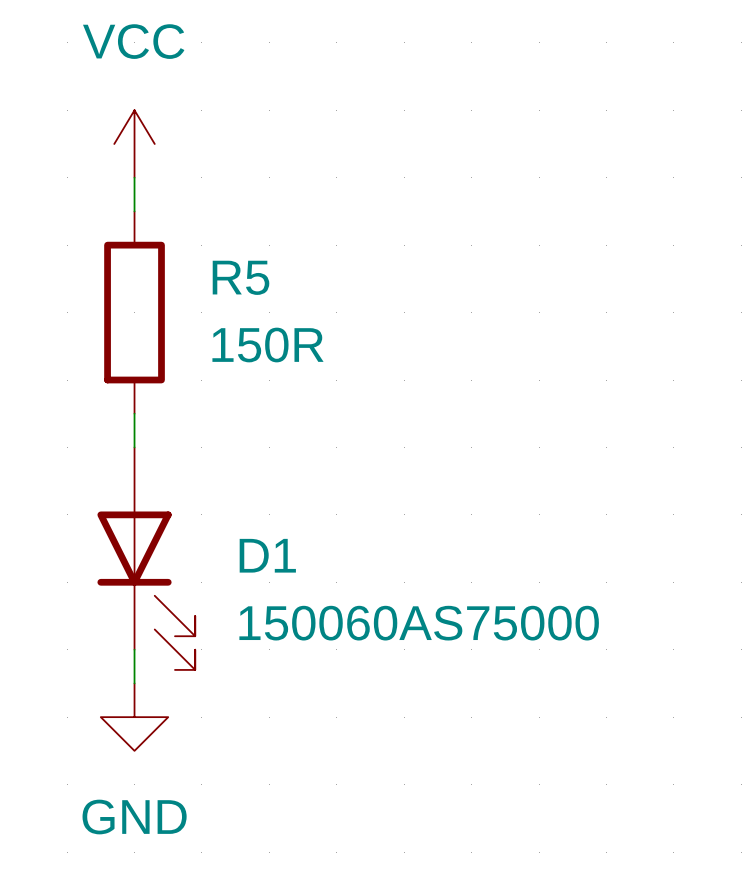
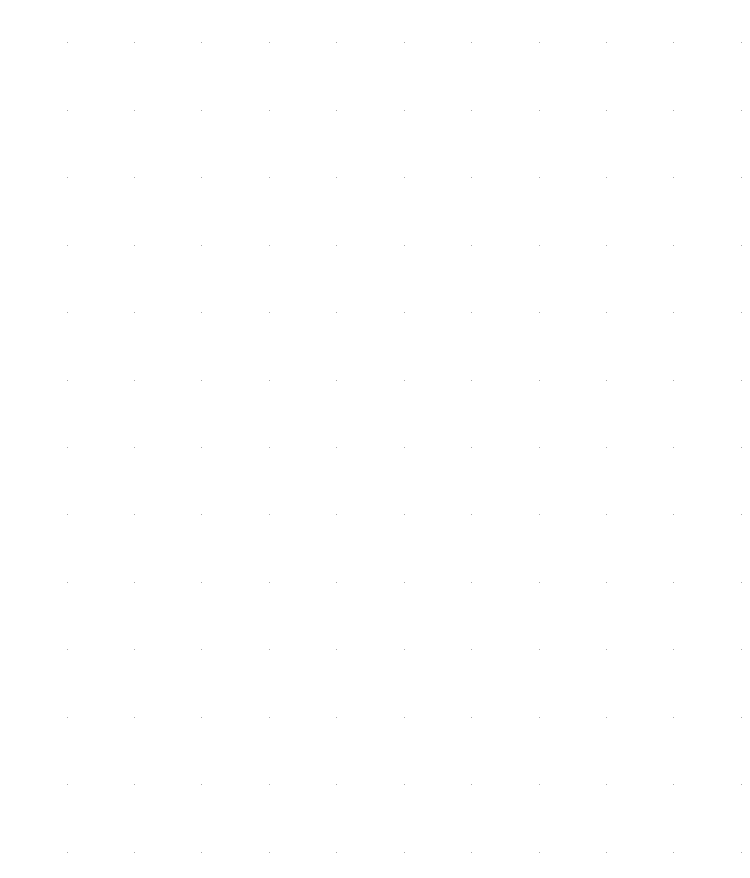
power symbol: VCC (134, 143) -> none
wire: (134, 177) (134, 211) -> none
R5: 150R (134, 312) -> none
wire: (134, 413) (134, 447) -> none
D1: 150060AS75000 (146, 558) -> none
wire: (134, 649) (134, 683) -> none
power symbol: GND (134, 717) -> none

